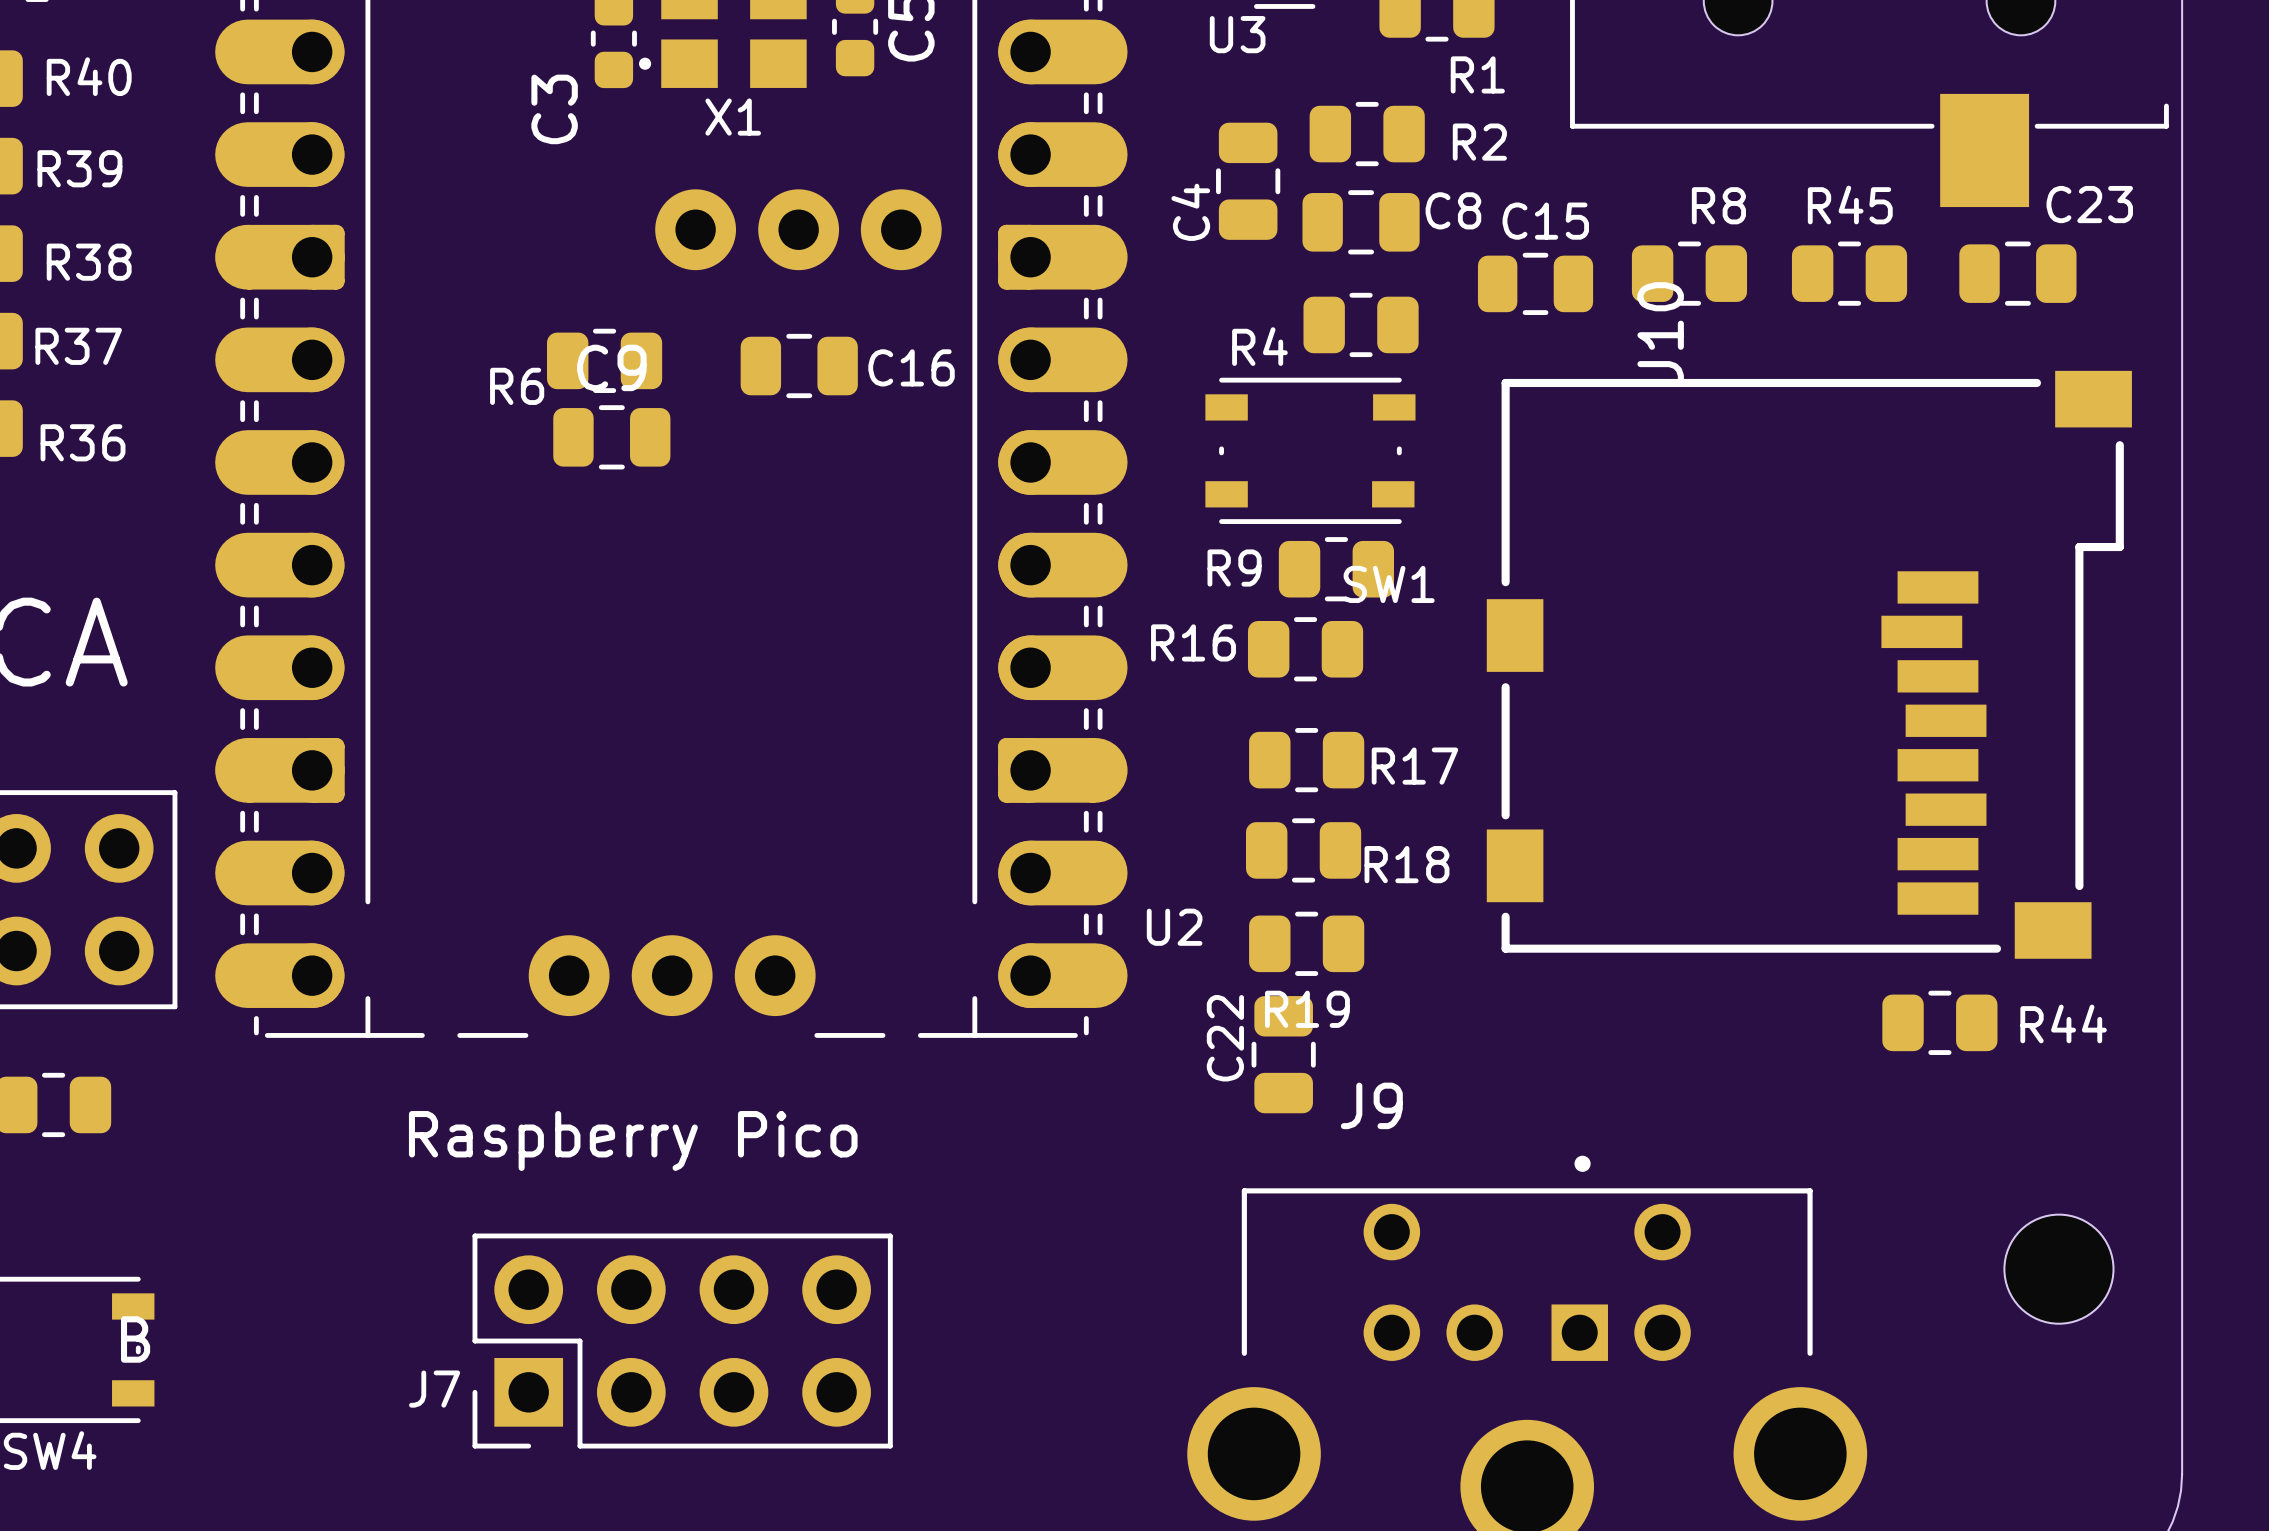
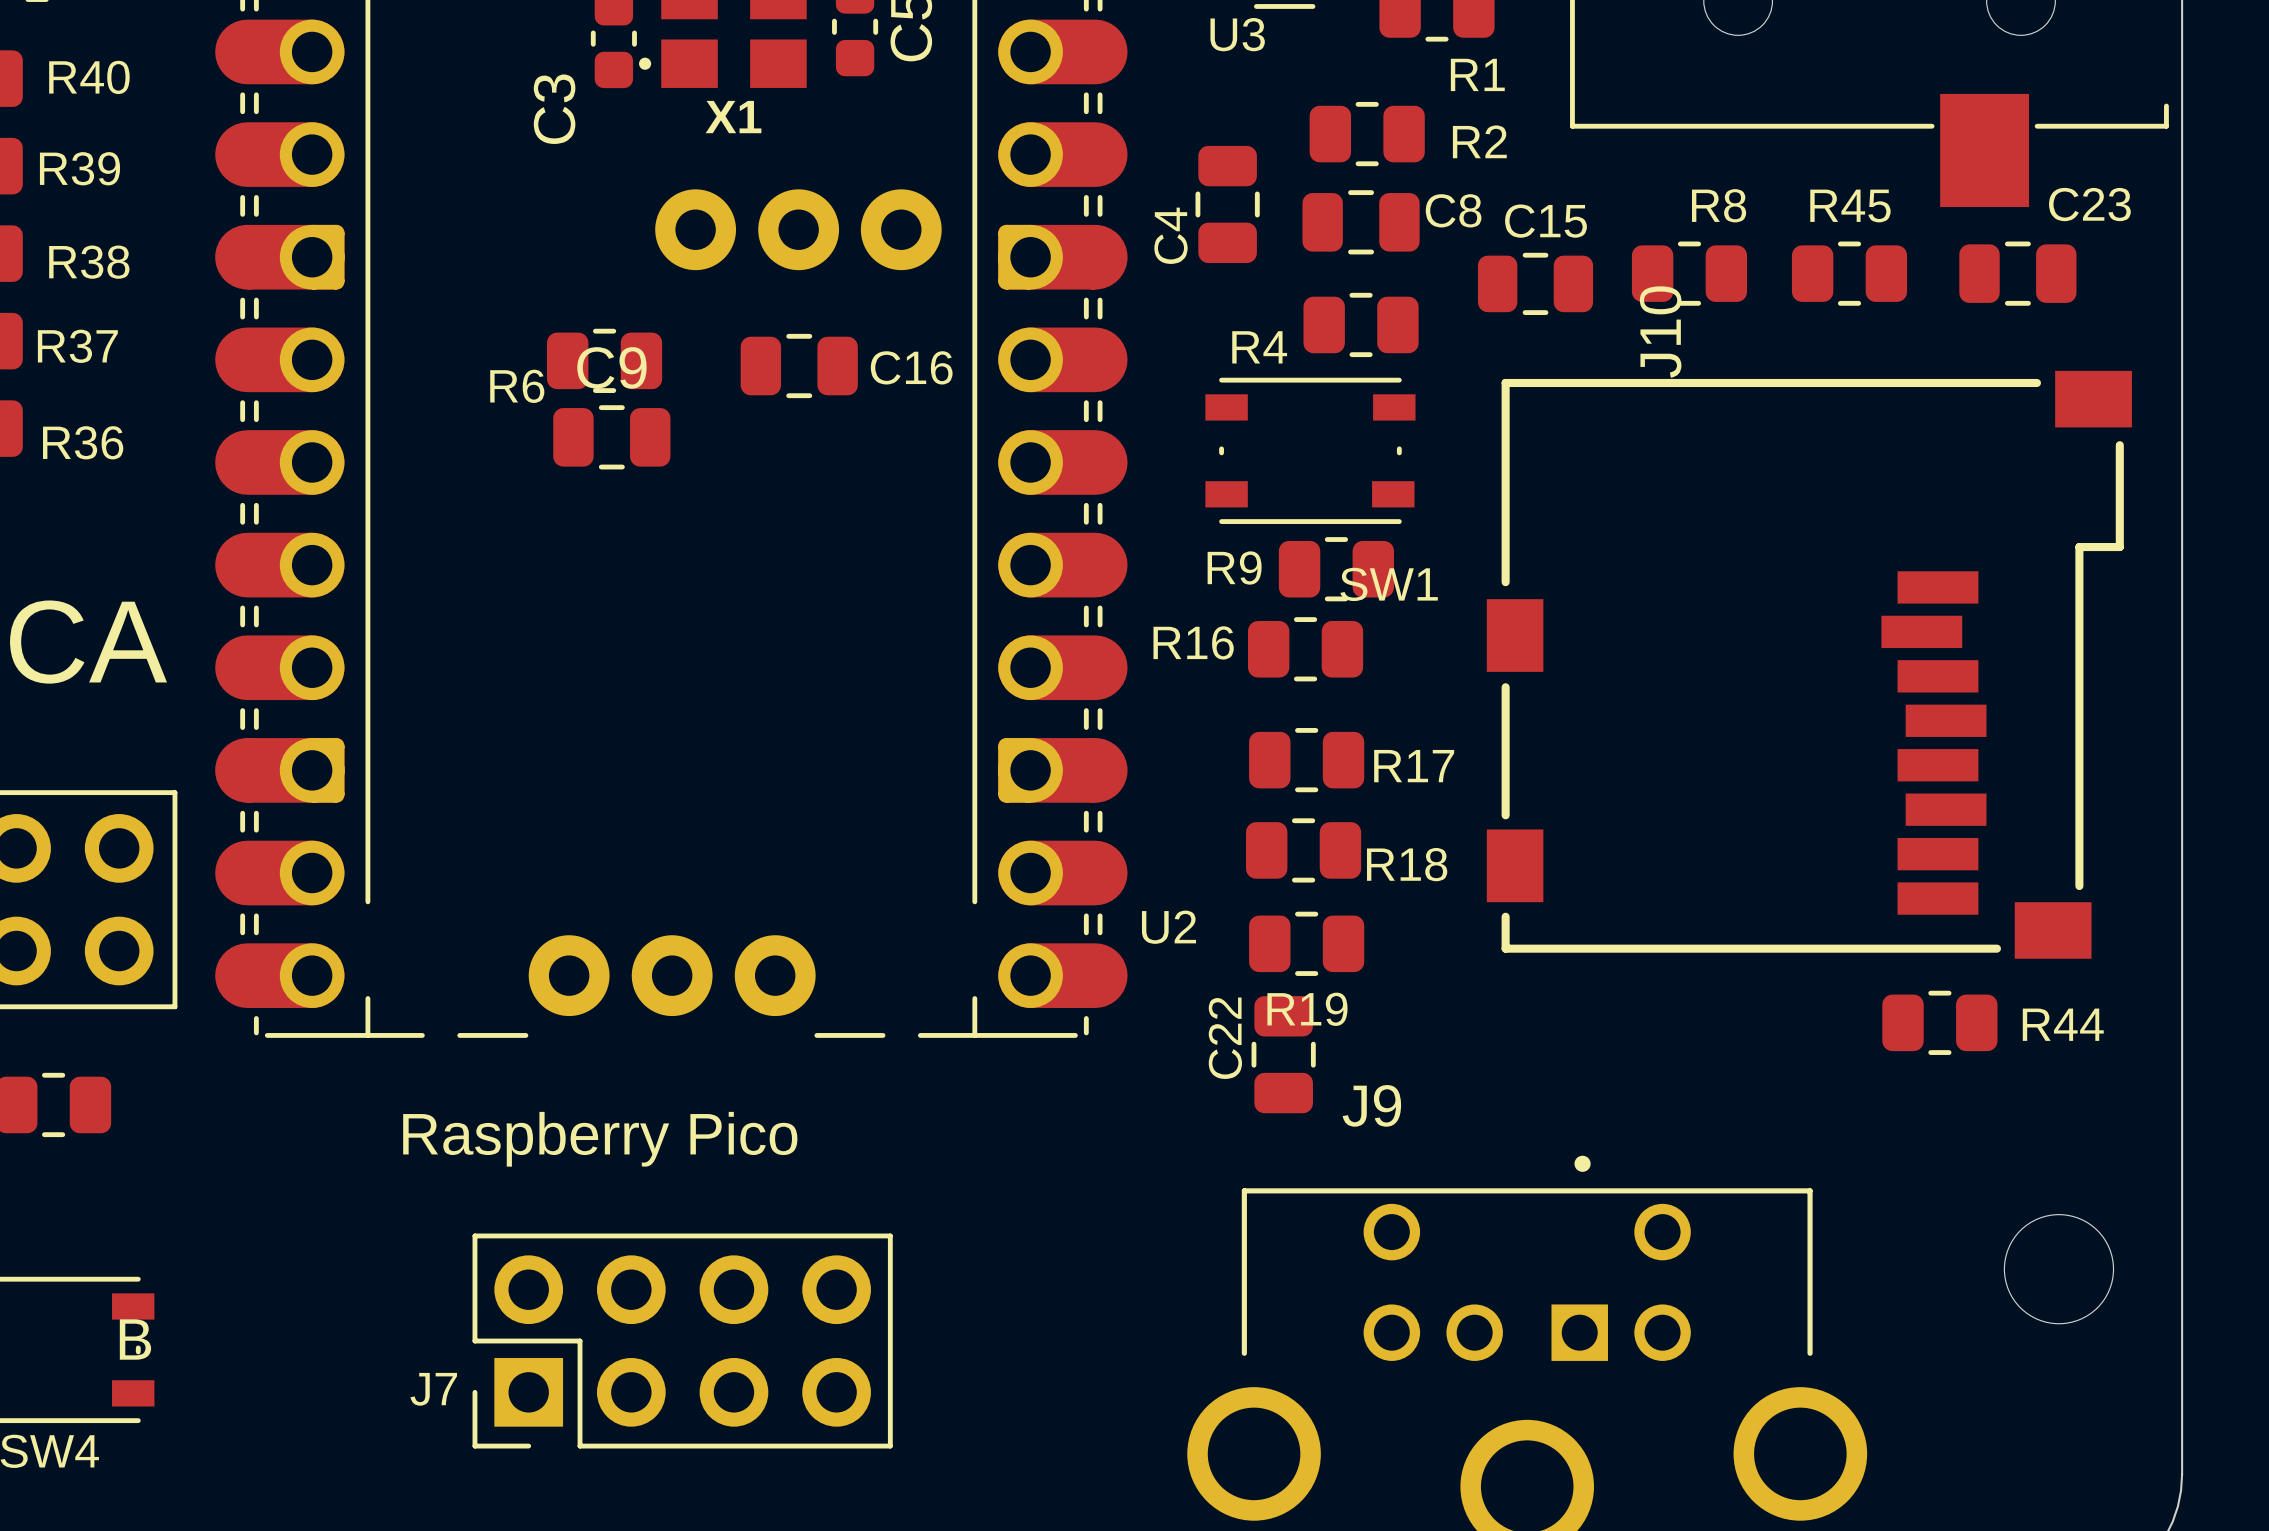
C4 position: (1248, 181) -> (1227, 204)

